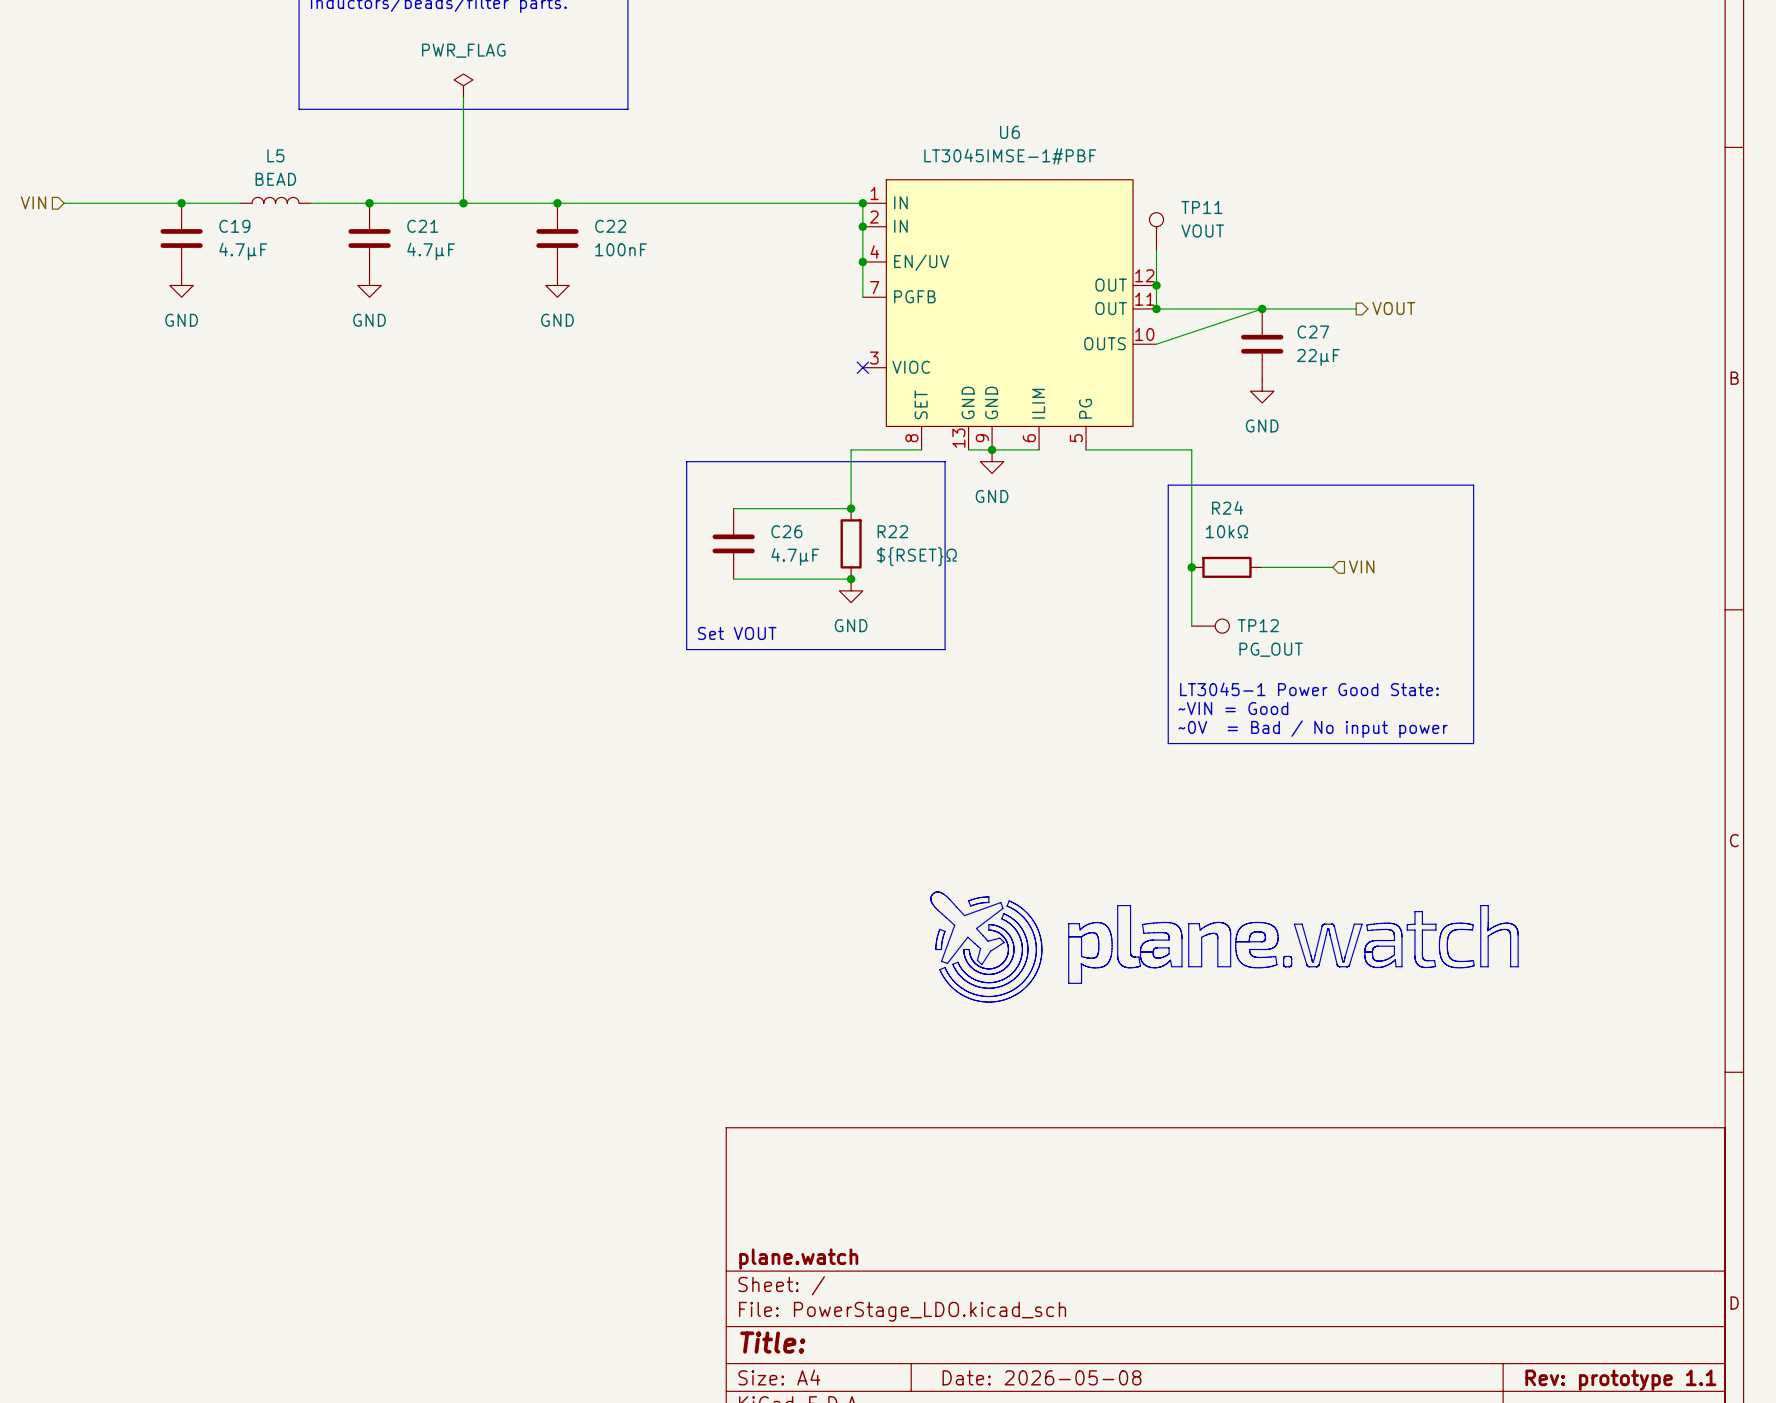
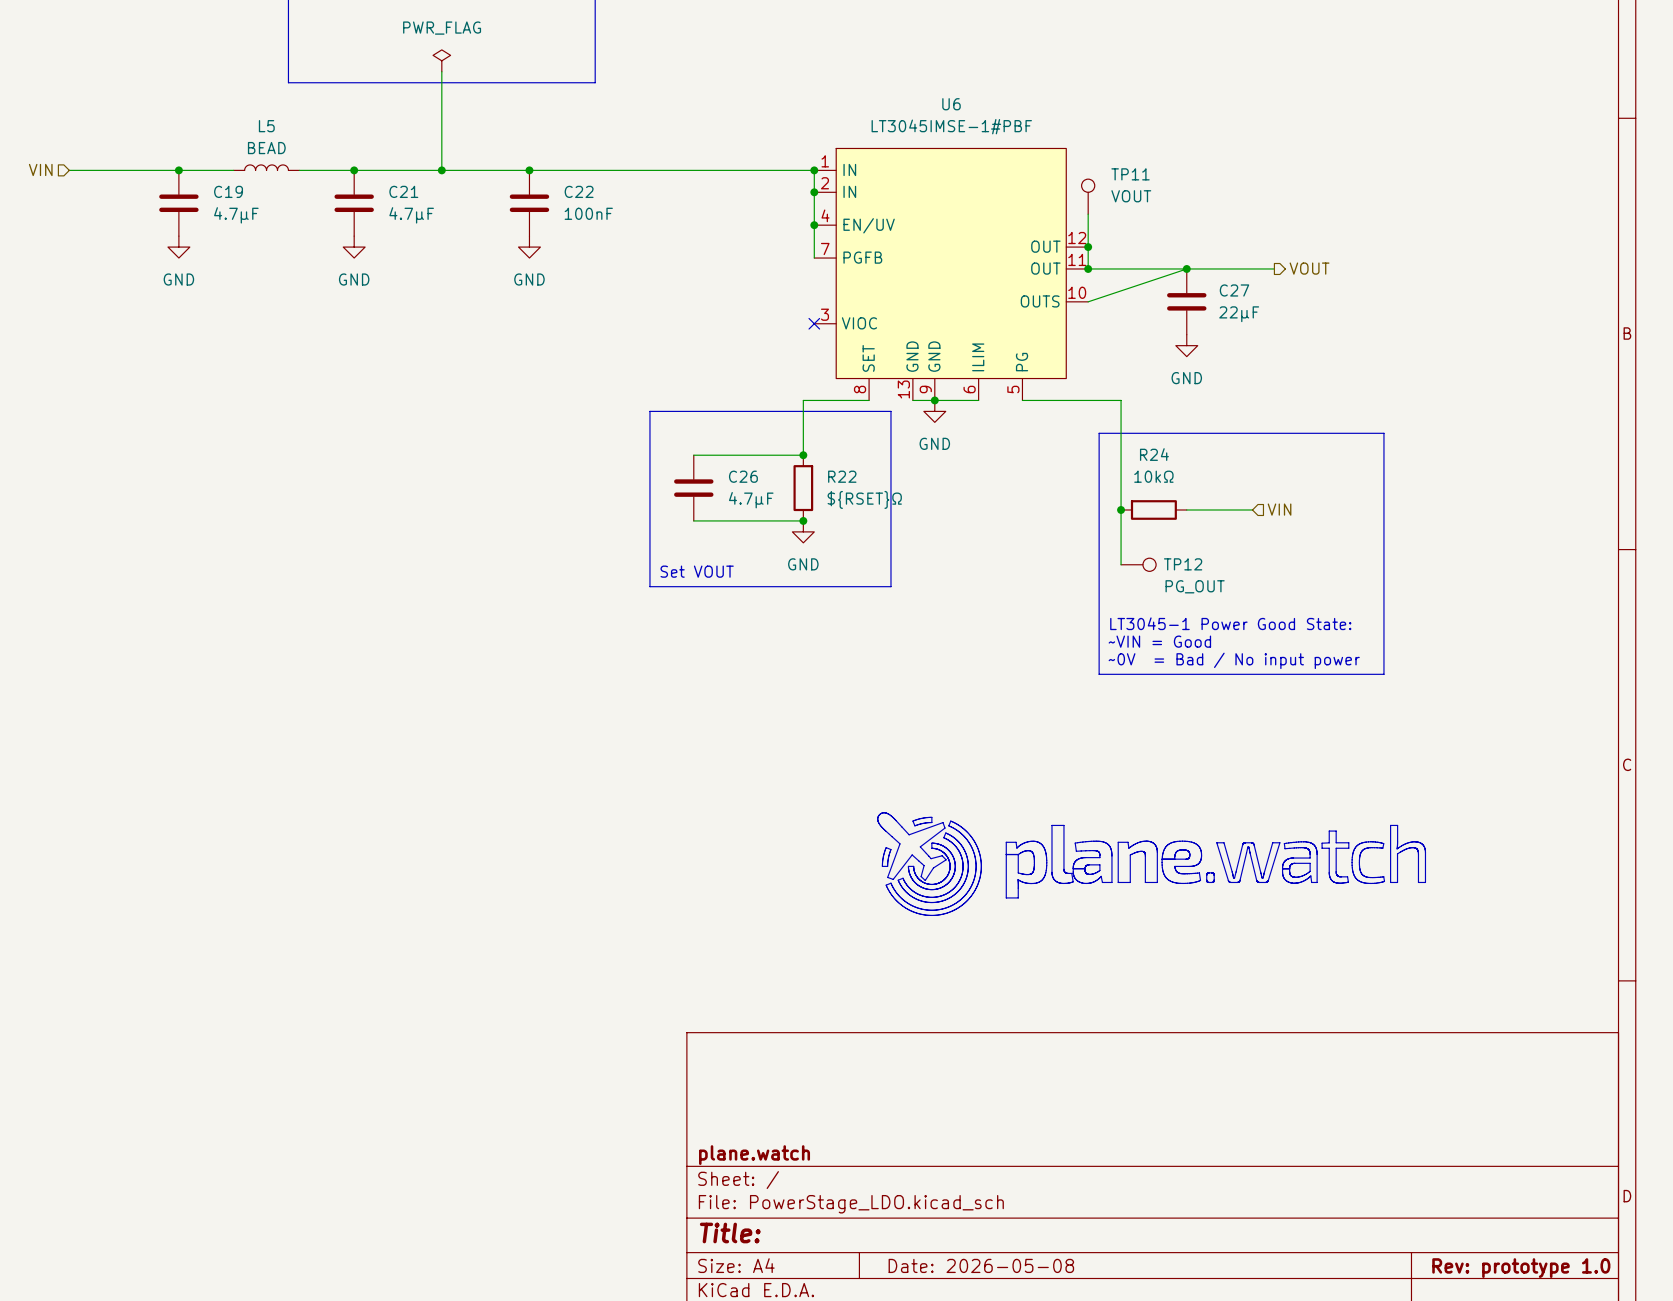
title block: Rev: prototype 1.1 (1620, 1380) -> Rev: prototype 1.0 (1521, 1268)

